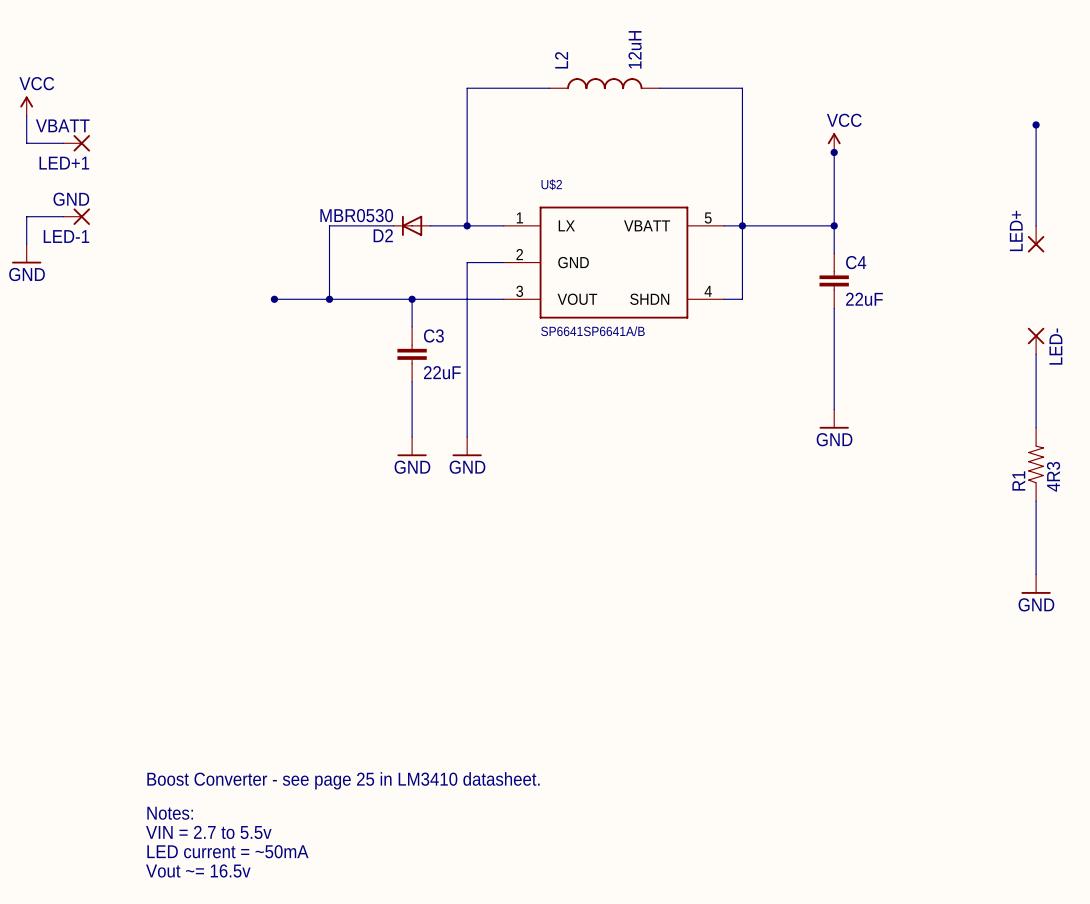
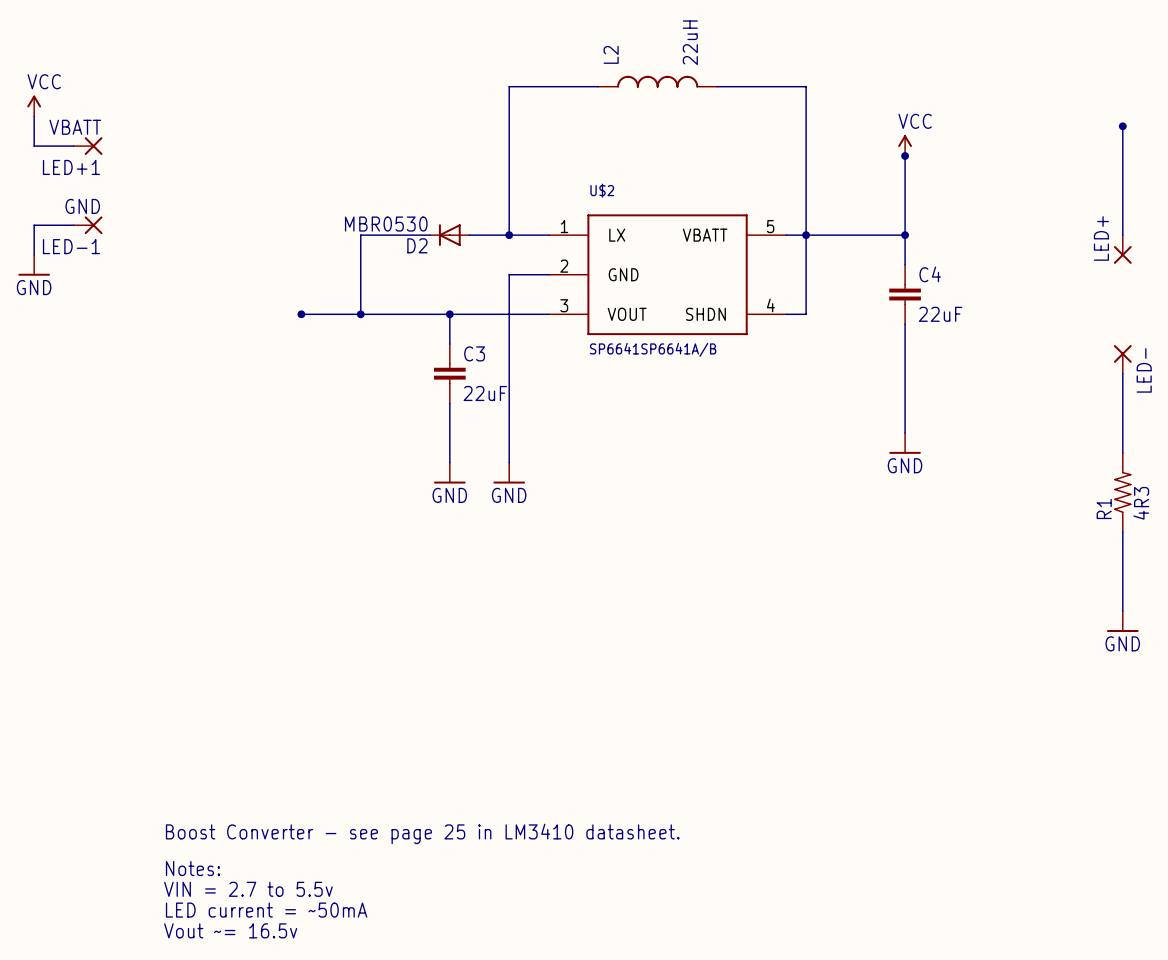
L2 value: 12uH (635, 49) -> 22uH (690, 42)

